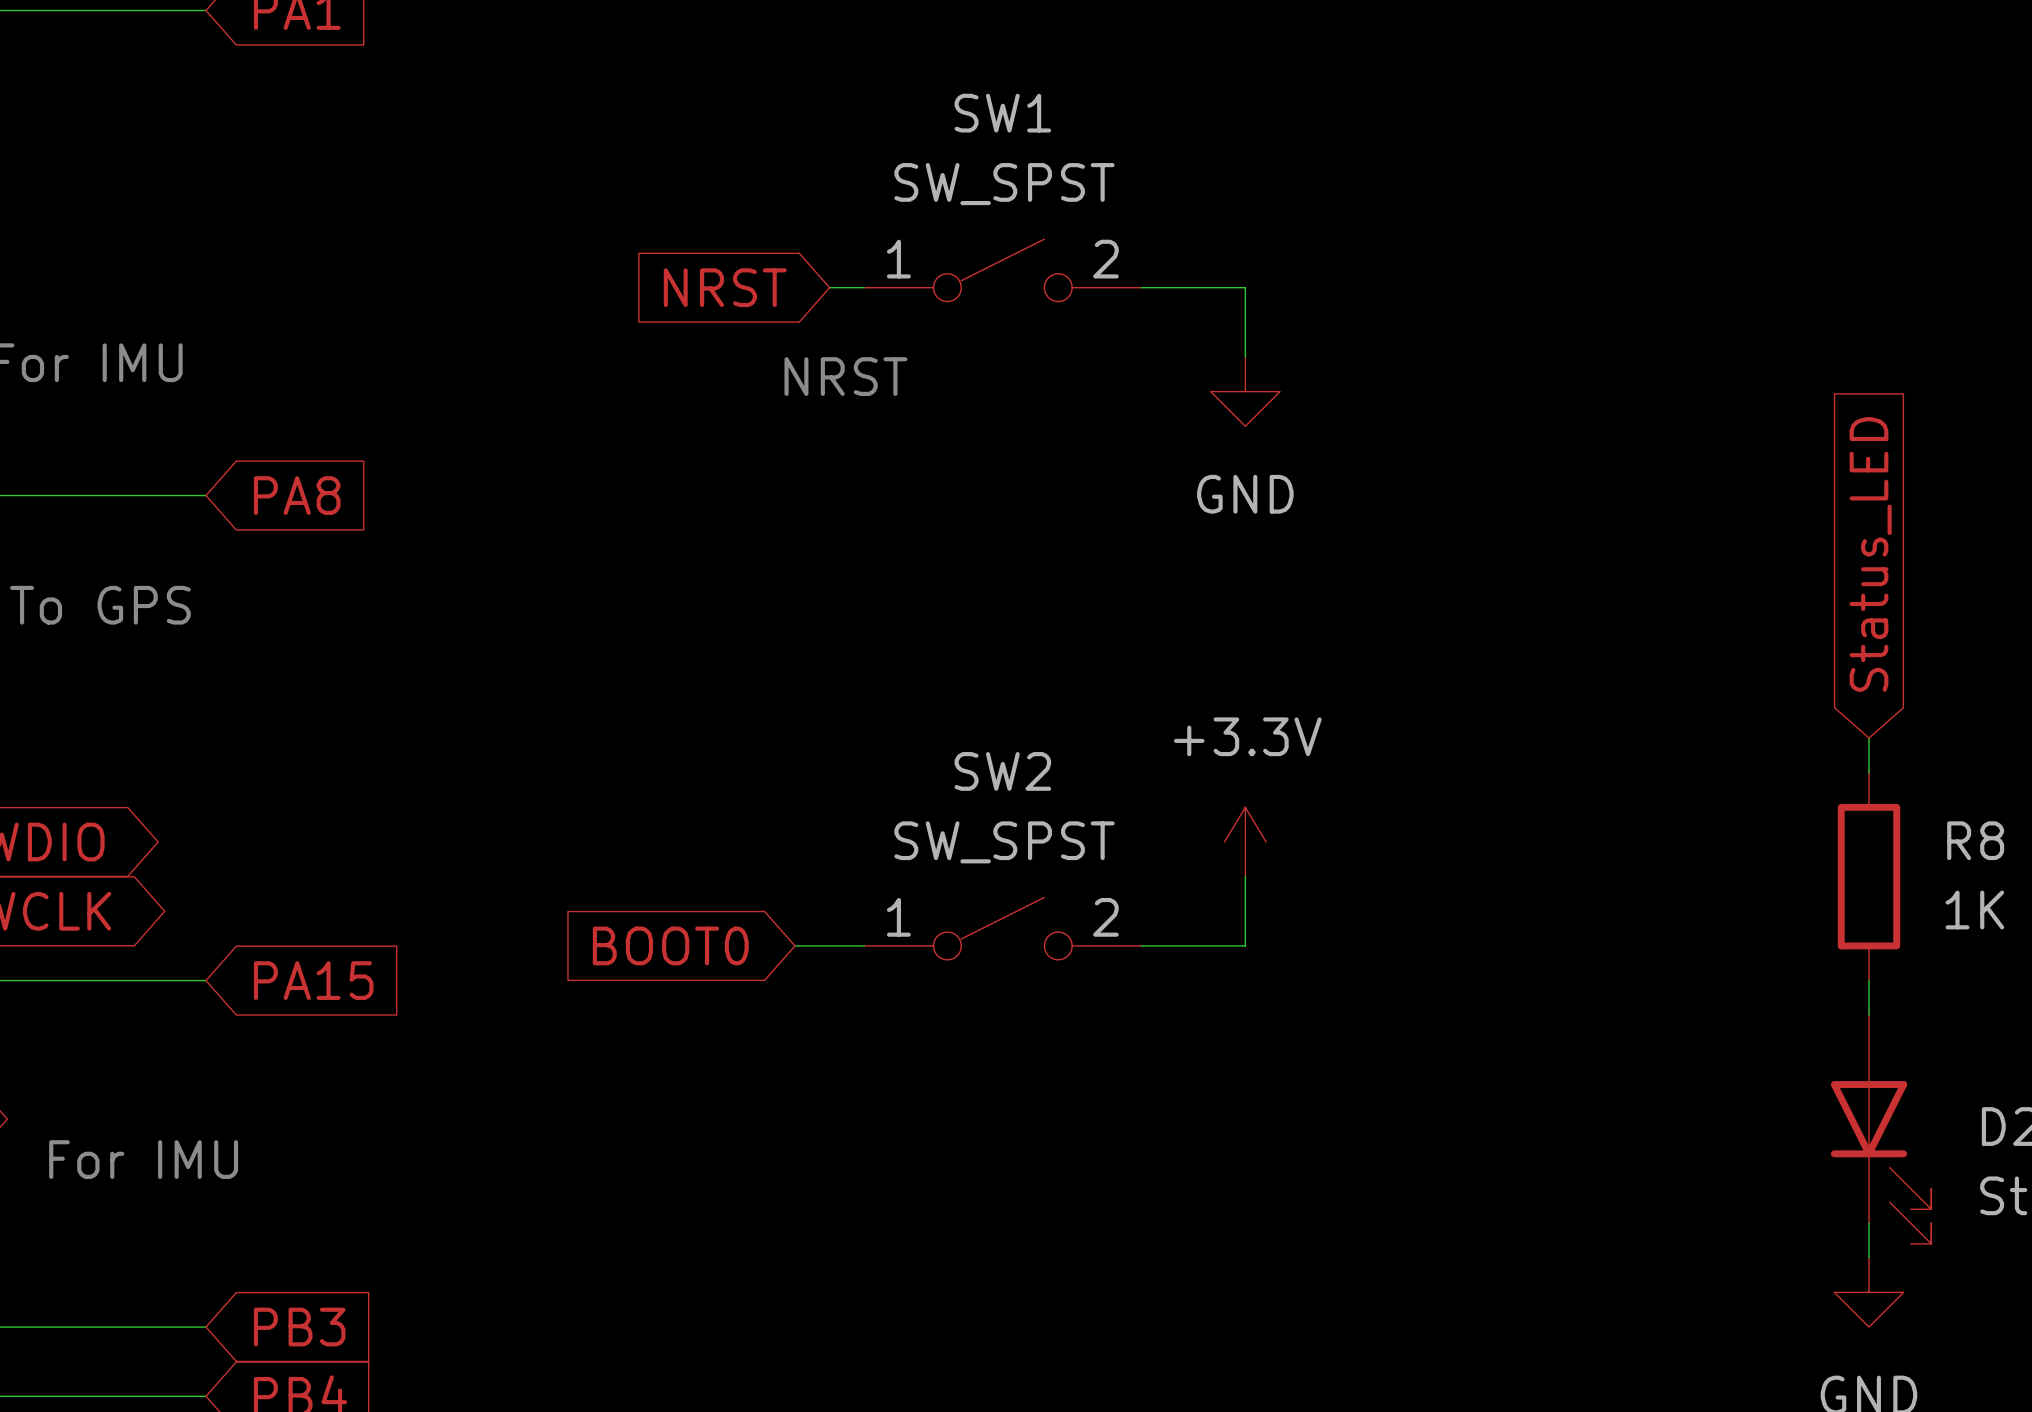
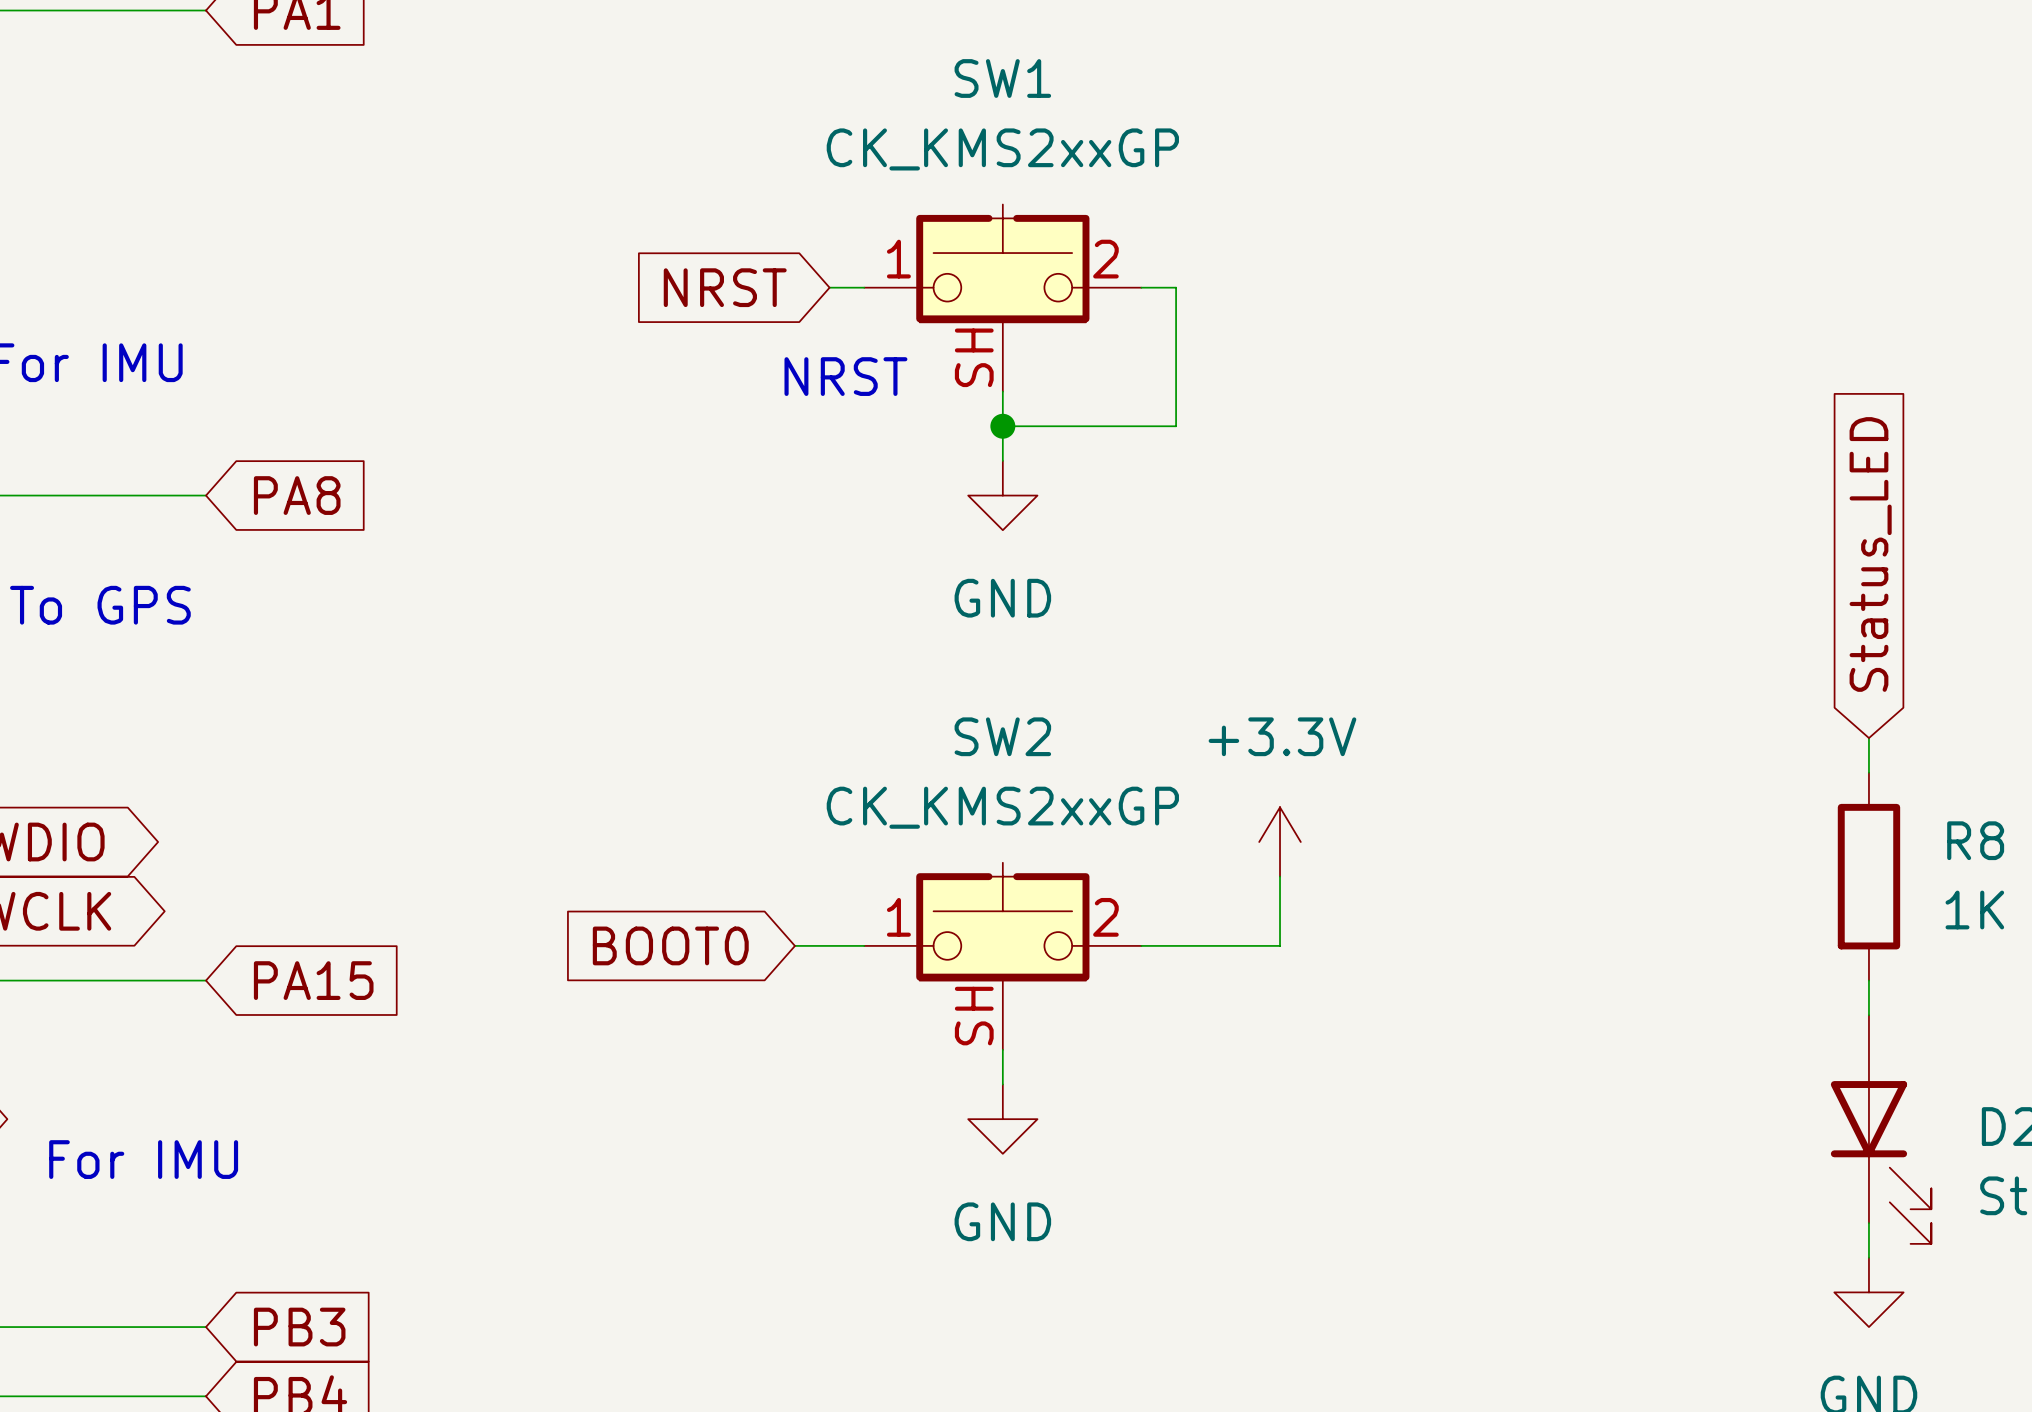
SW1 name position: SW1 (1002, 113) -> SW1 (1002, 78)
SW1 value: SW_SPST (1004, 184) -> CK_KMS2xxGP (1002, 149)
SW1 symbol: [864, 239, 1142, 302] -> [864, 204, 1142, 392]
wire: (1176, 287) (1245, 287) (1245, 356) -> (1176, 287) (1176, 426) (1002, 426)
wire: none -> (1002, 391) (1002, 460)
power symbol position: GND (1245, 391) -> GND (1002, 495)
junction: none -> (1002, 426)
SW2 name position: SW2 (1002, 771) -> SW2 (1002, 736)
SW2 value: SW_SPST (1004, 842) -> CK_KMS2xxGP (1002, 807)
power symbol position: +3.3V (1245, 842) -> +3.3V (1280, 842)
wire: (1245, 876) (1245, 945) -> (1280, 876) (1280, 945) (1245, 945)
SW2 symbol: [864, 897, 1142, 960] -> [864, 862, 1142, 1050]
wire: none -> (1002, 1049) (1002, 1084)
power symbol: none -> GND (1002, 1119)

